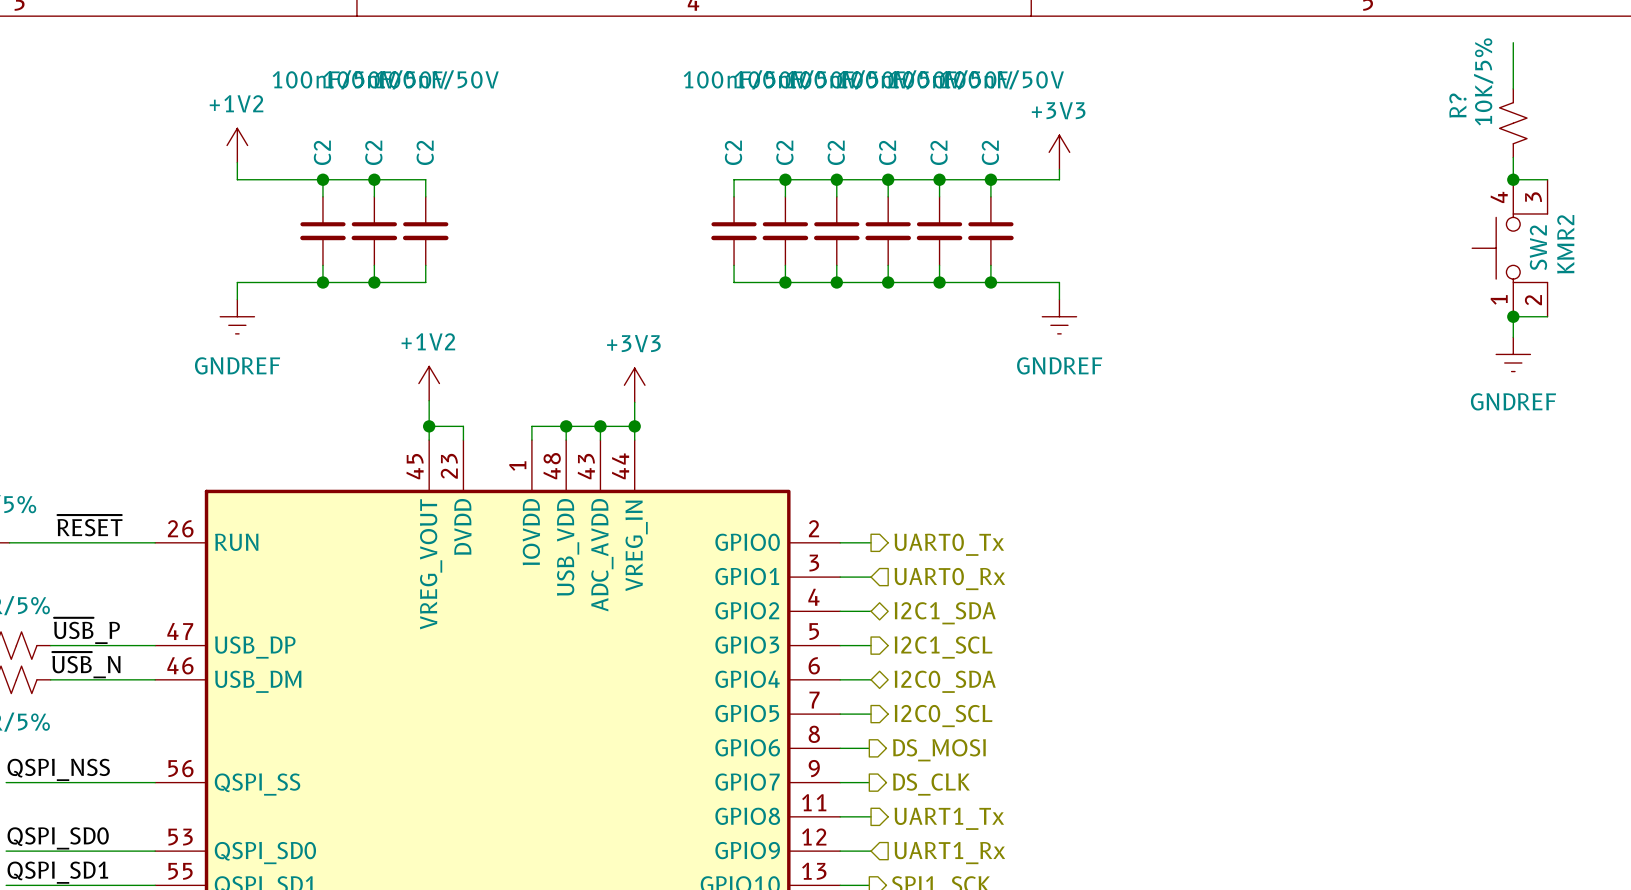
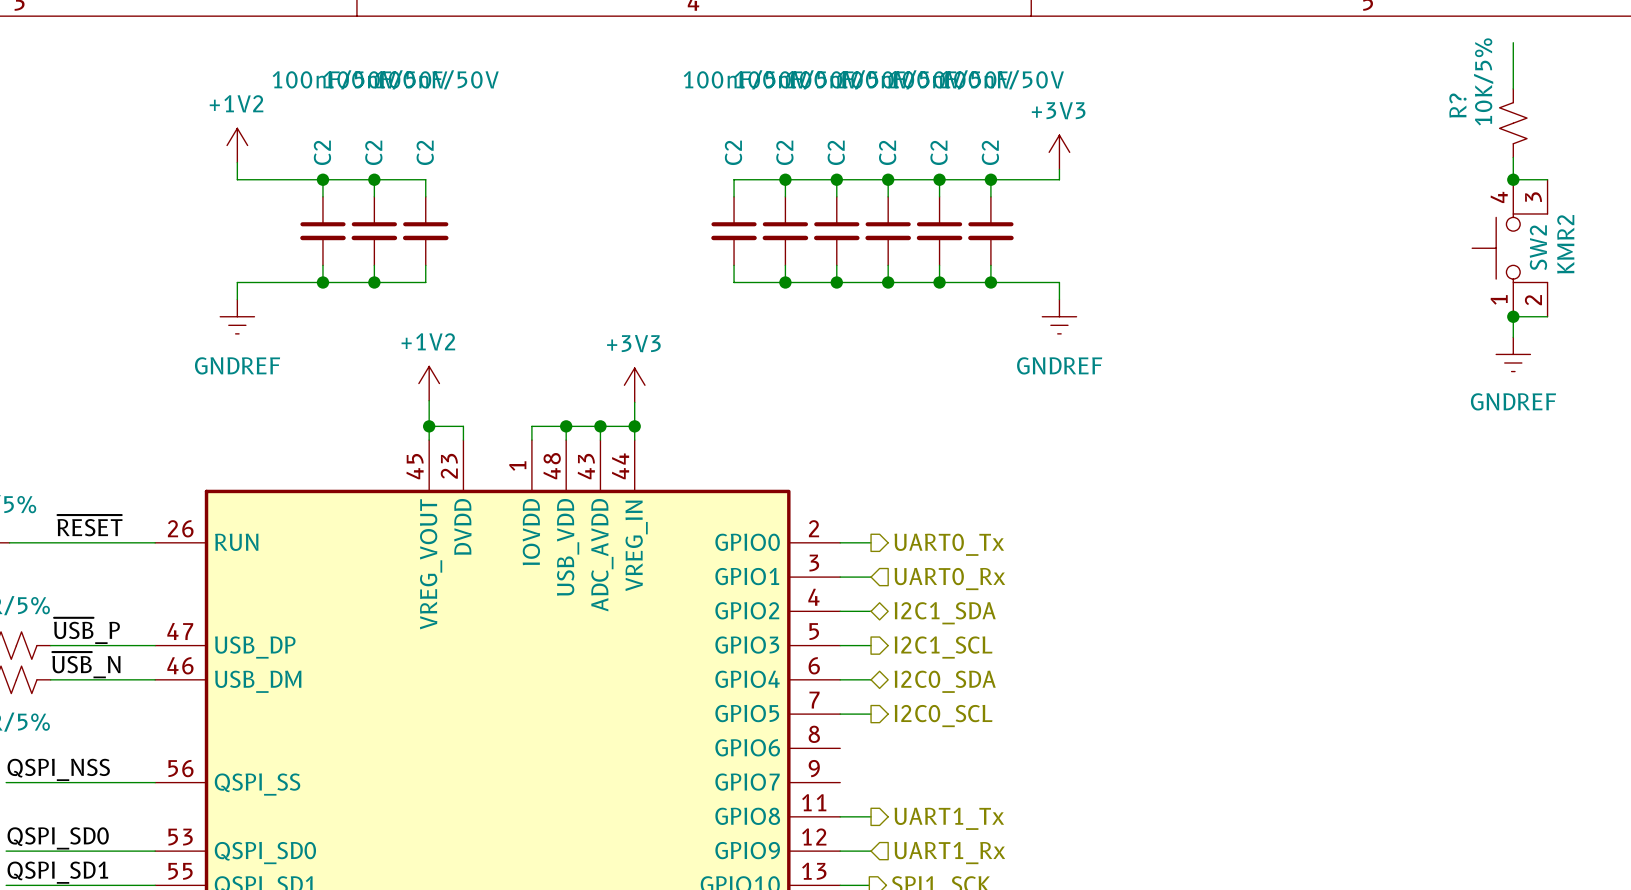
wire: (840, 748) (869, 748) -> none
hierarchical label: DS_MOSI (939, 750) -> none
wire: (840, 782) (869, 782) -> none
hierarchical label: DS_CLK (931, 784) -> none

